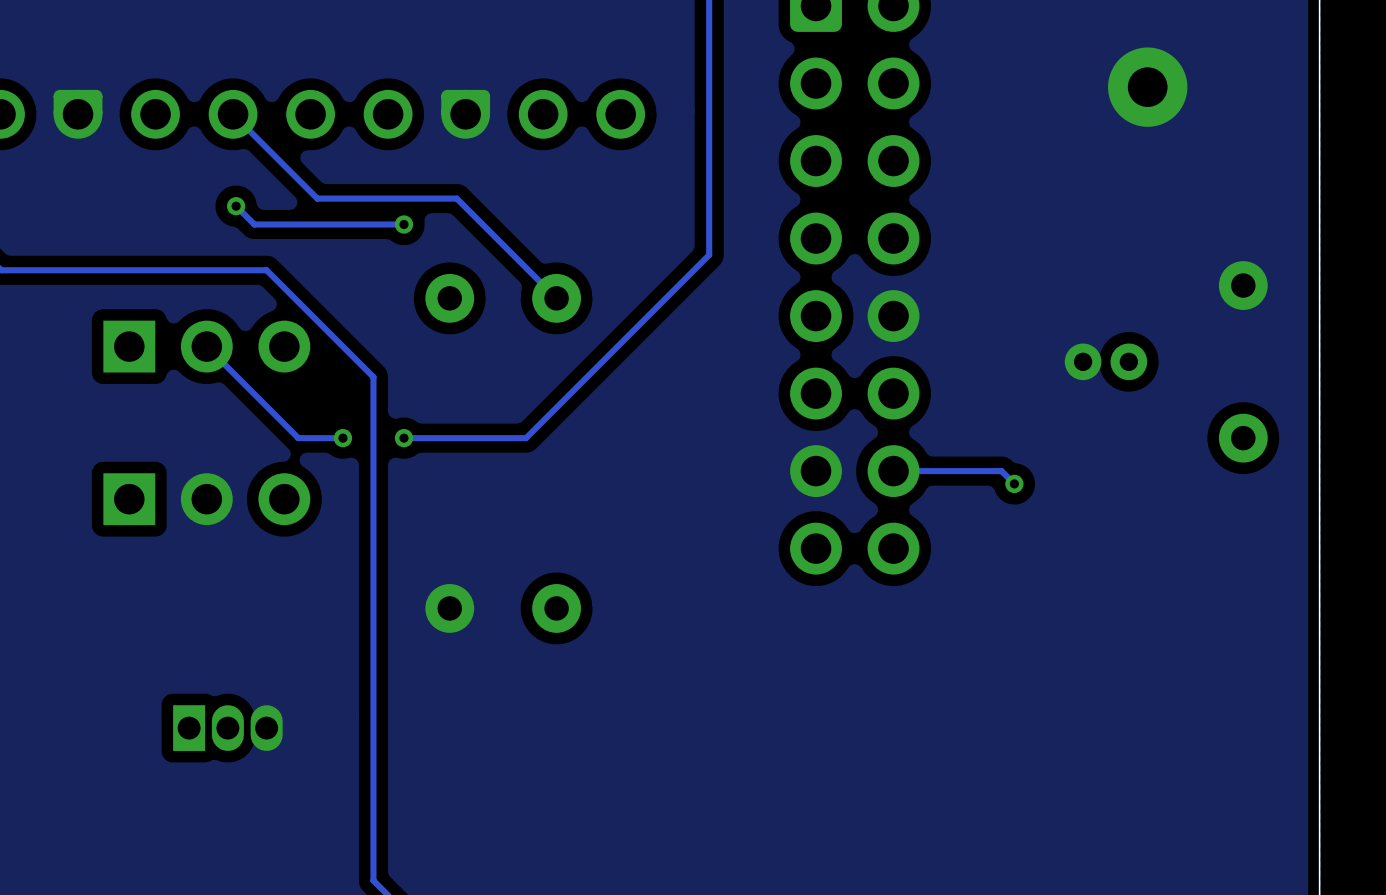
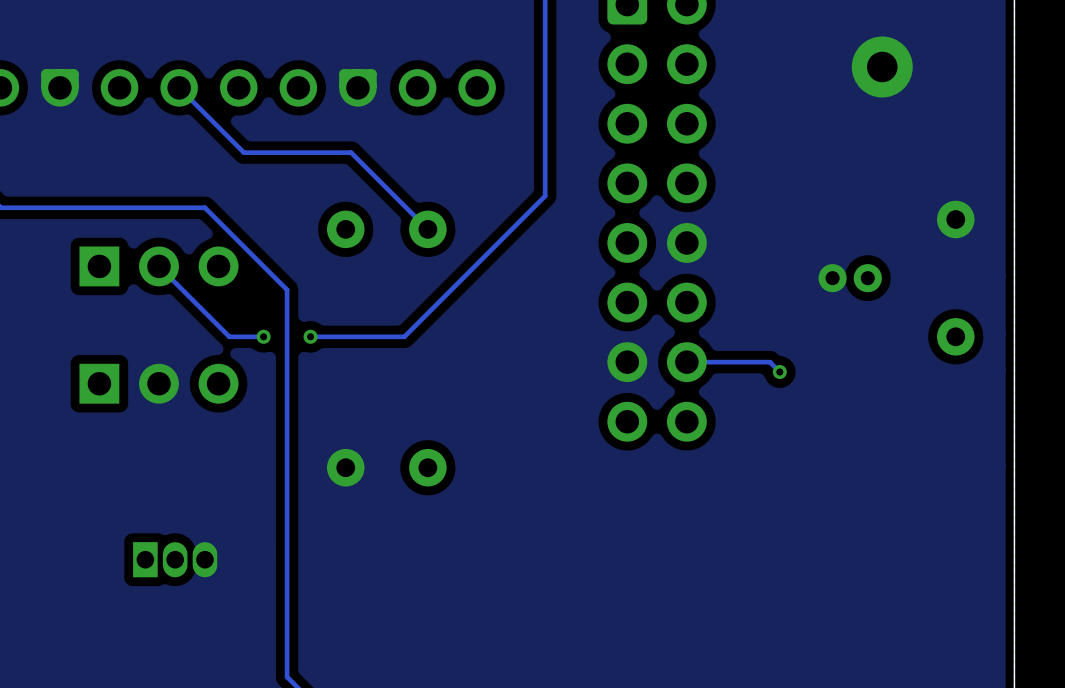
track: (236, 206) (254, 224) (403, 224) -> none
via: (236, 206) -> none
via: (403, 224) -> none

